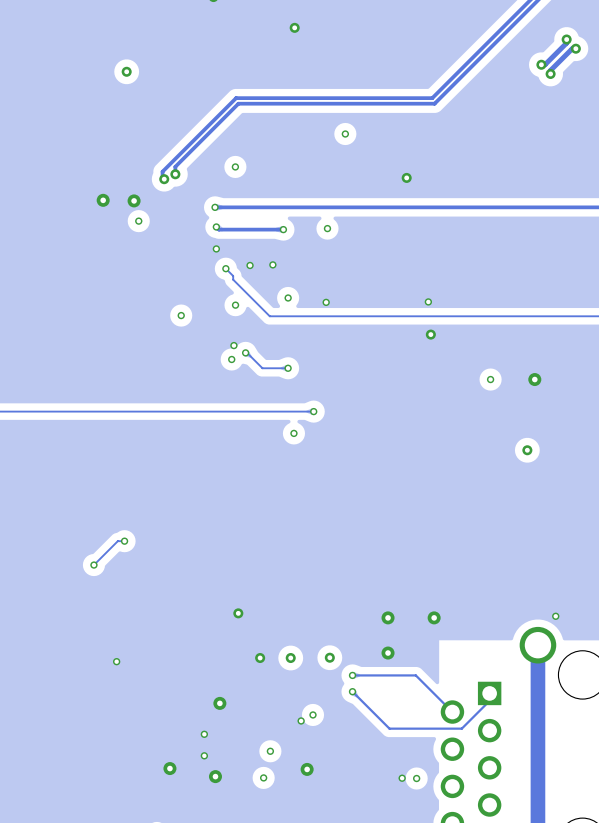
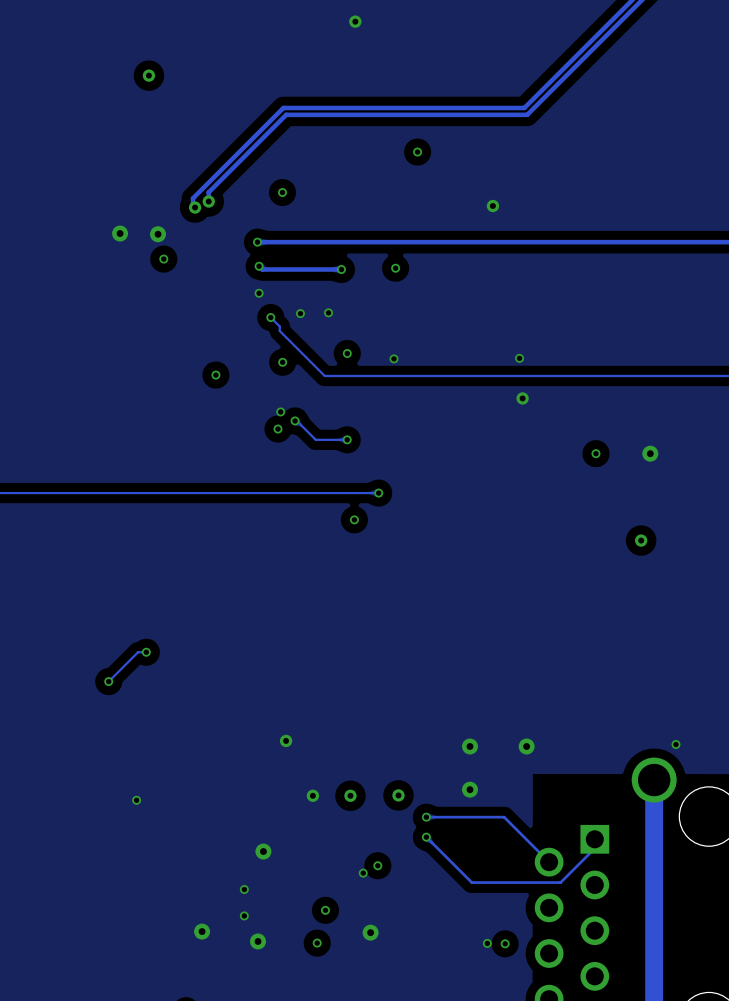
track: (566, 39) (566, 43) (544, 64) (541, 64) -> none
via: (566, 39) -> none
track: (575, 48) (572, 48) (550, 70) (550, 73) -> none
via: (575, 48) -> none
via: (541, 64) -> none
via: (550, 73) -> none

